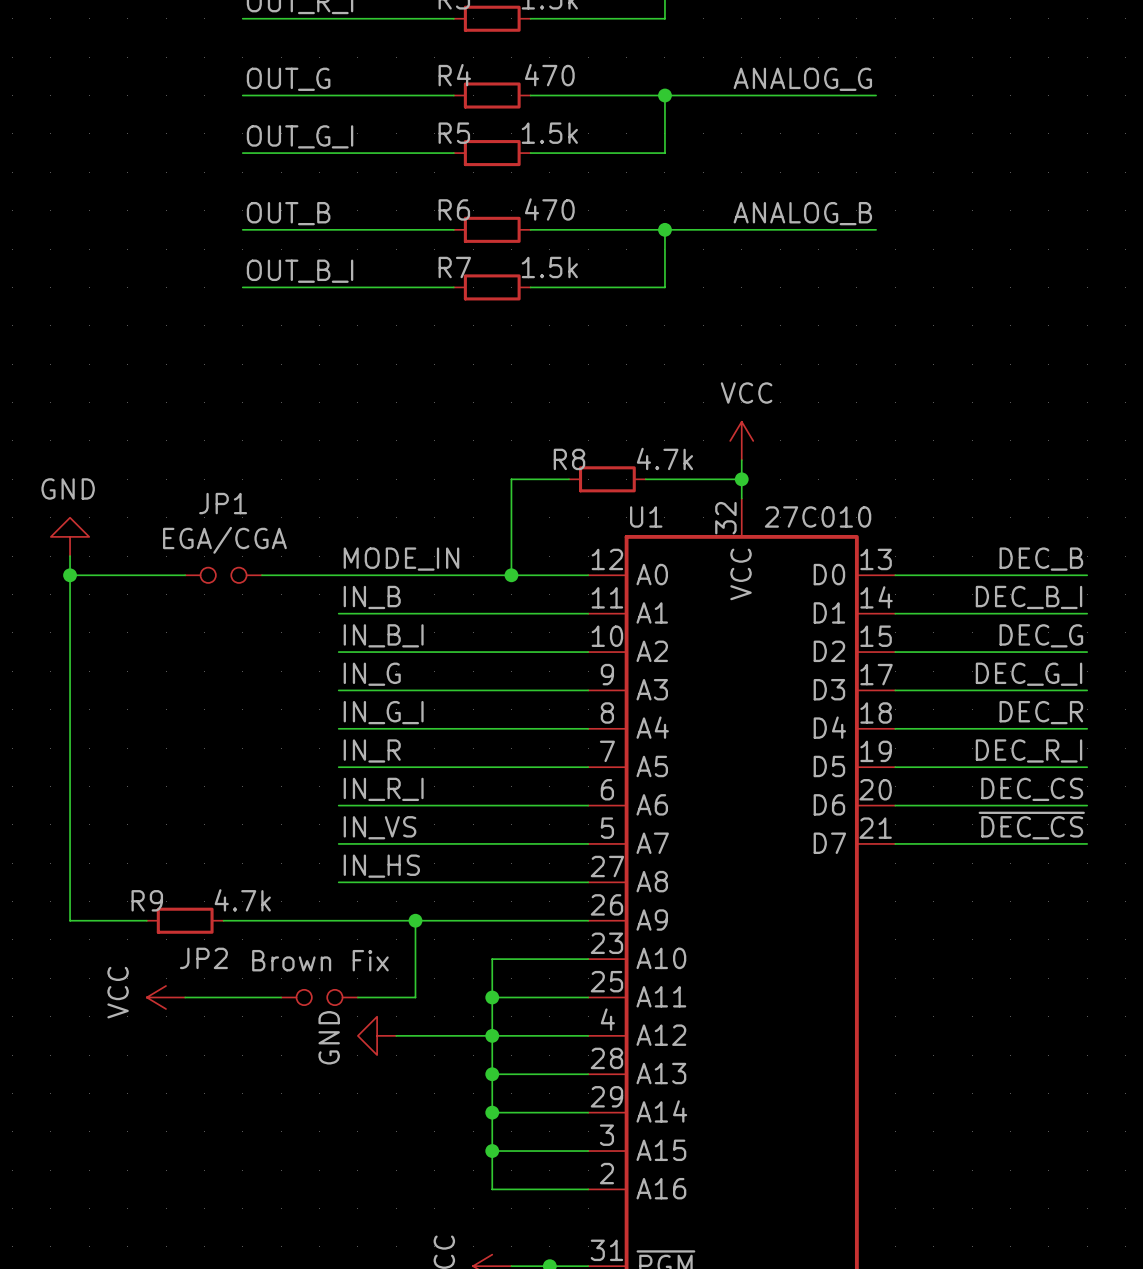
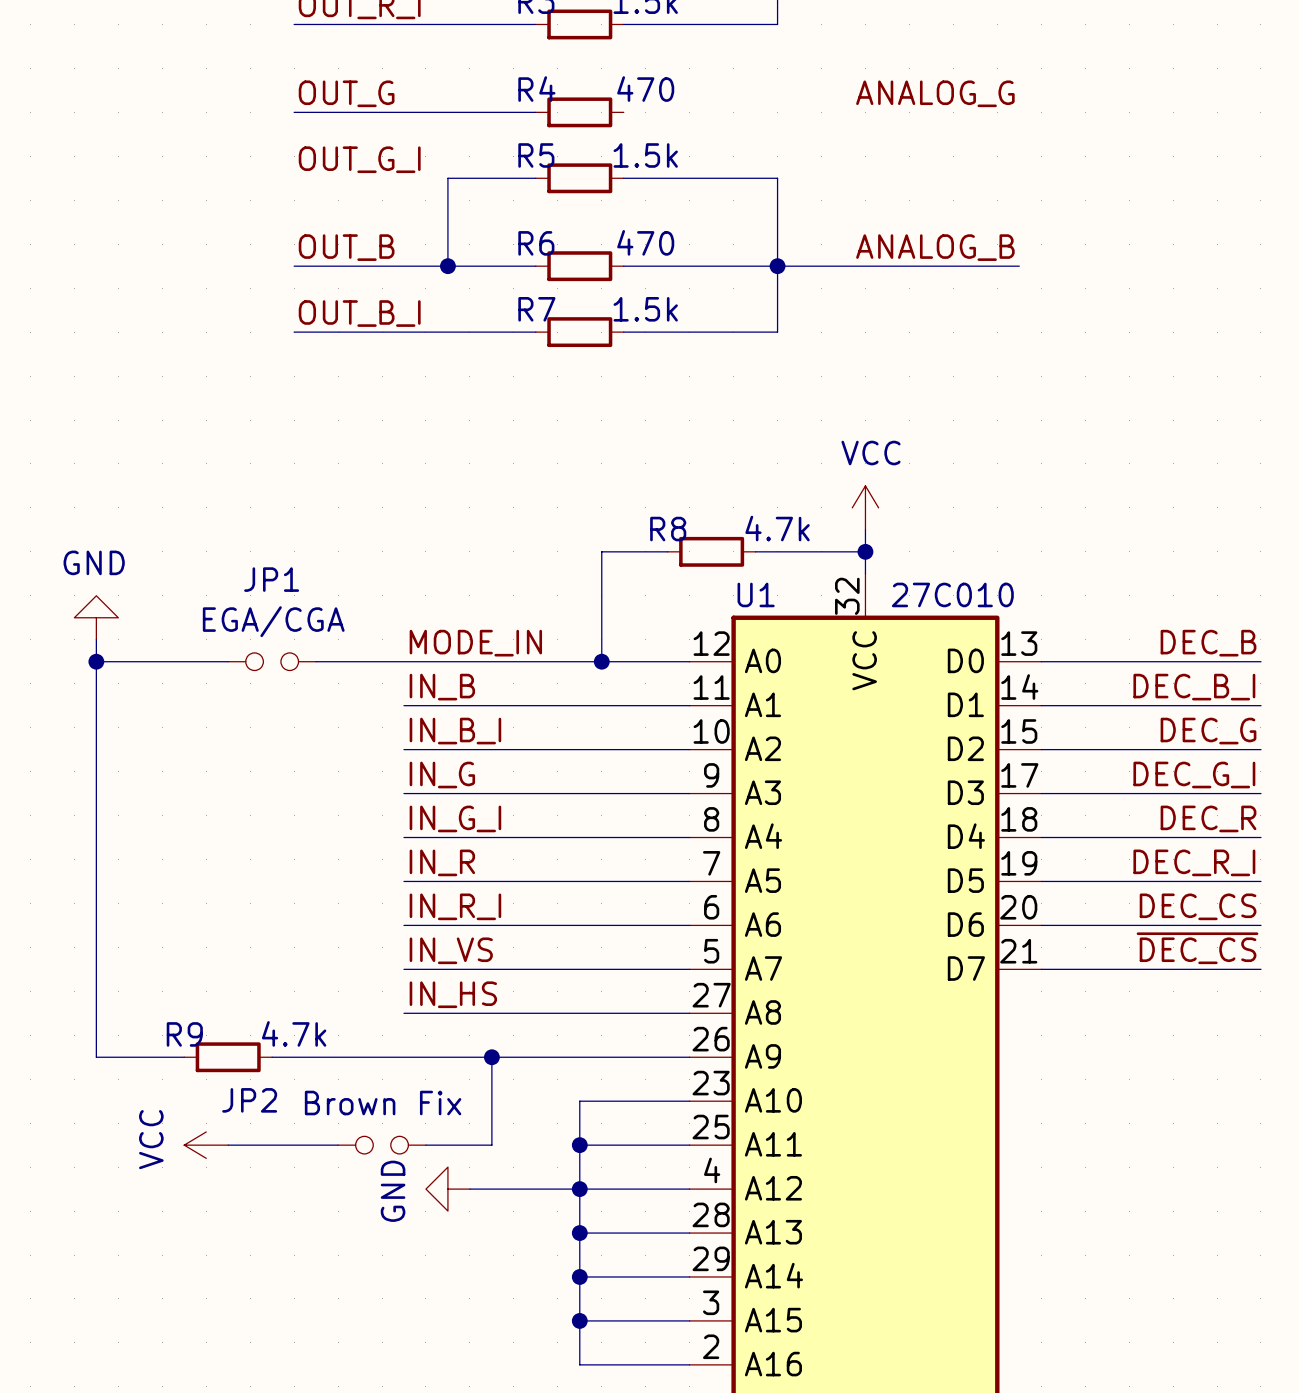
wire: (530, 95) (876, 95) -> none
wire: (664, 95) (664, 153) -> (777, 266) (777, 178)
junction: (664, 95) -> none
wire: (242, 153) (377, 153) -> (447, 266) (447, 178)
junction: none -> (447, 266)

